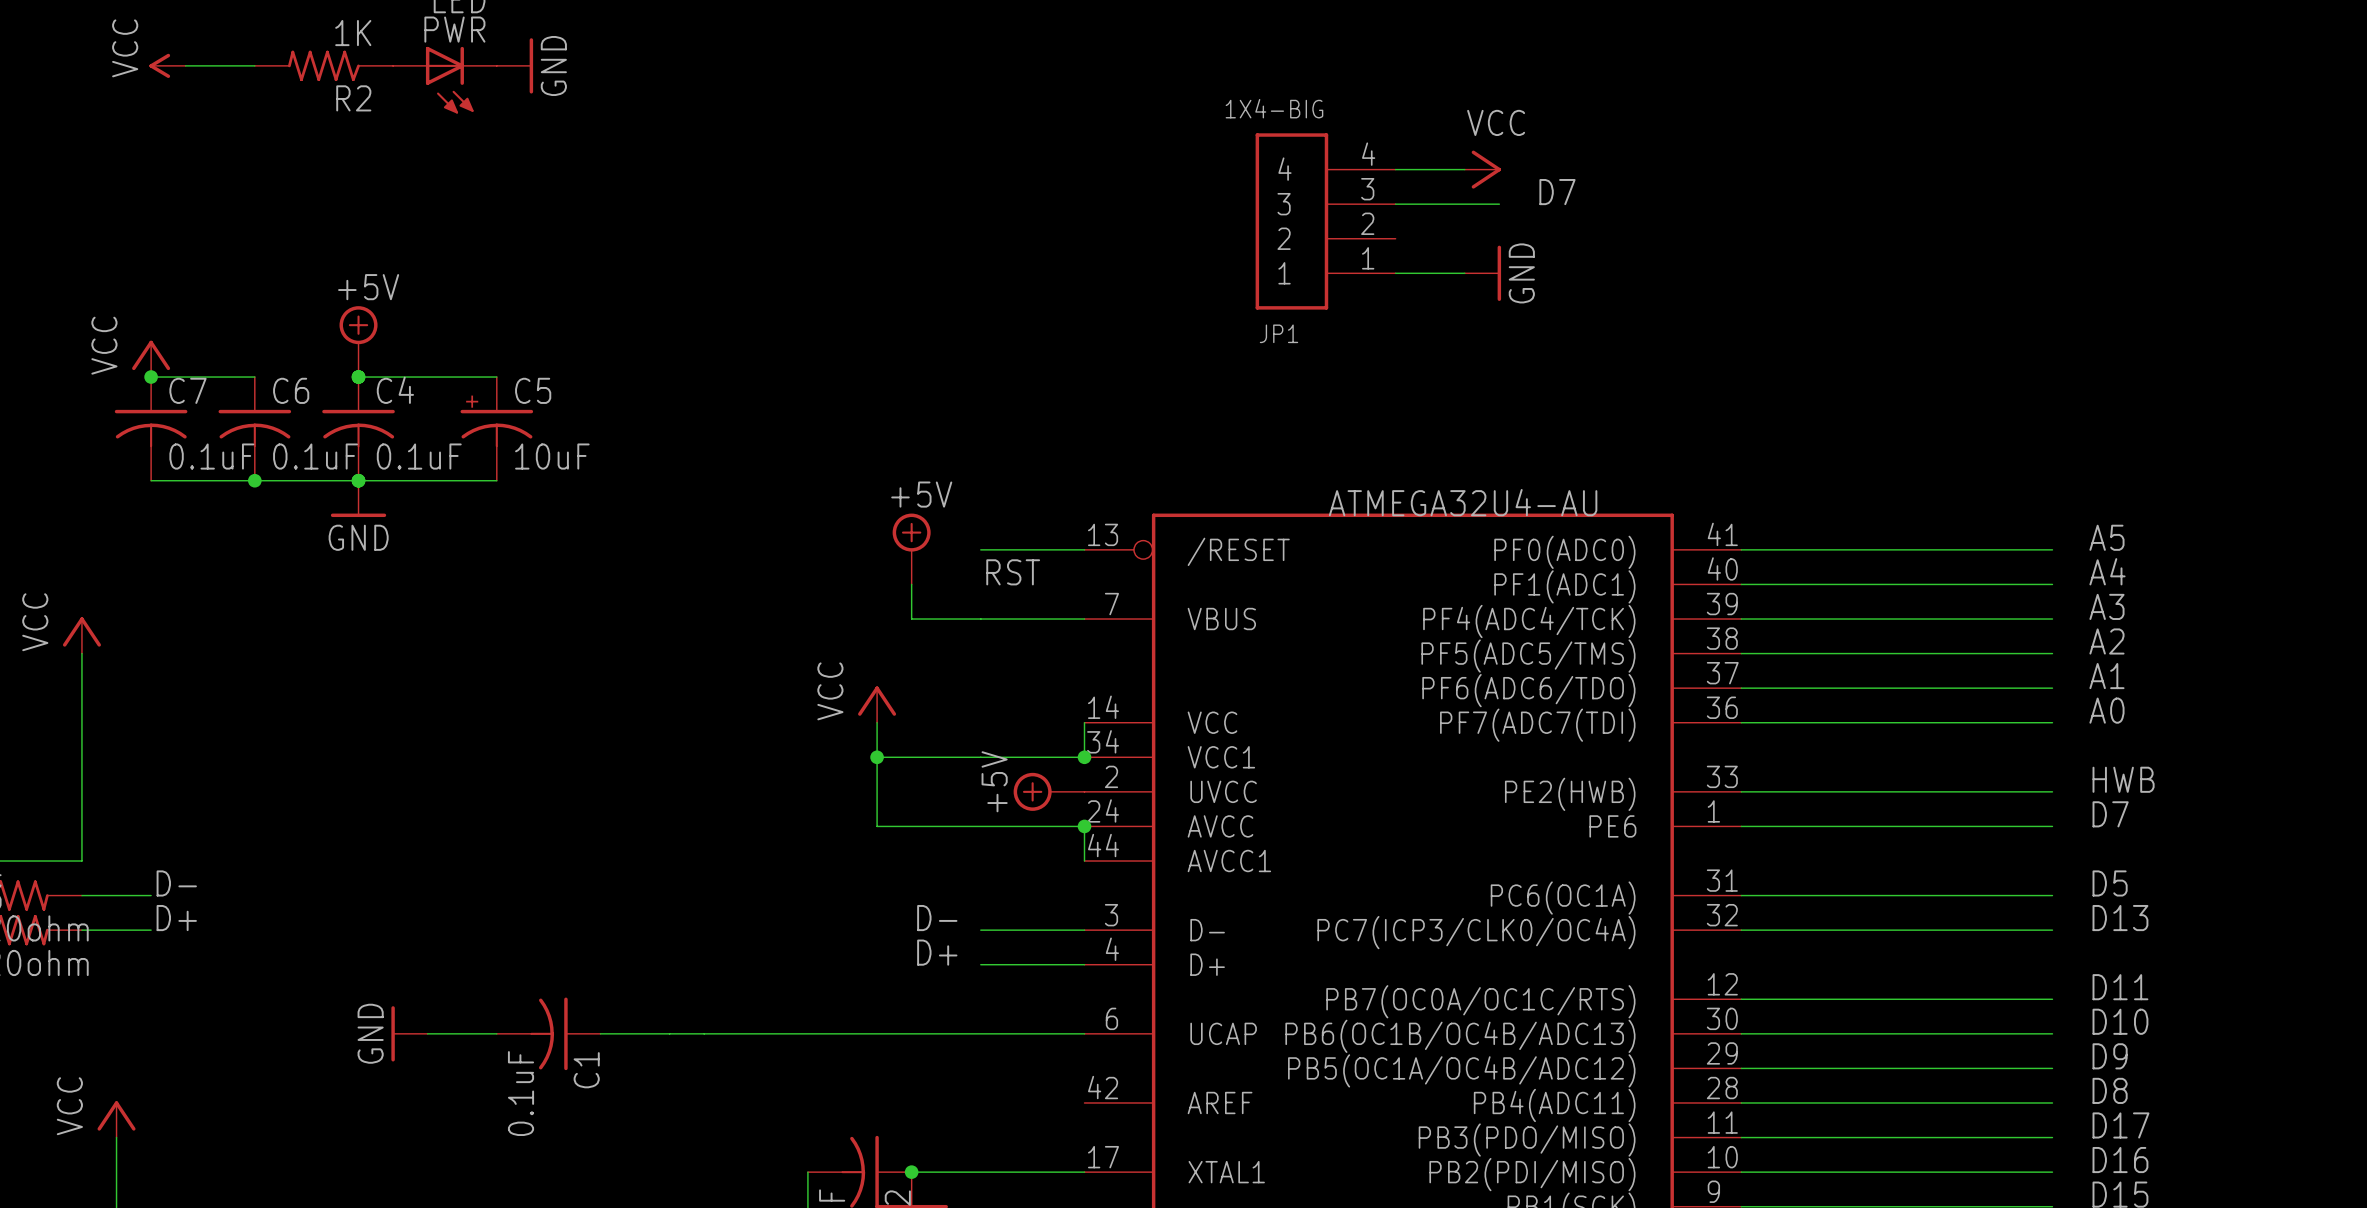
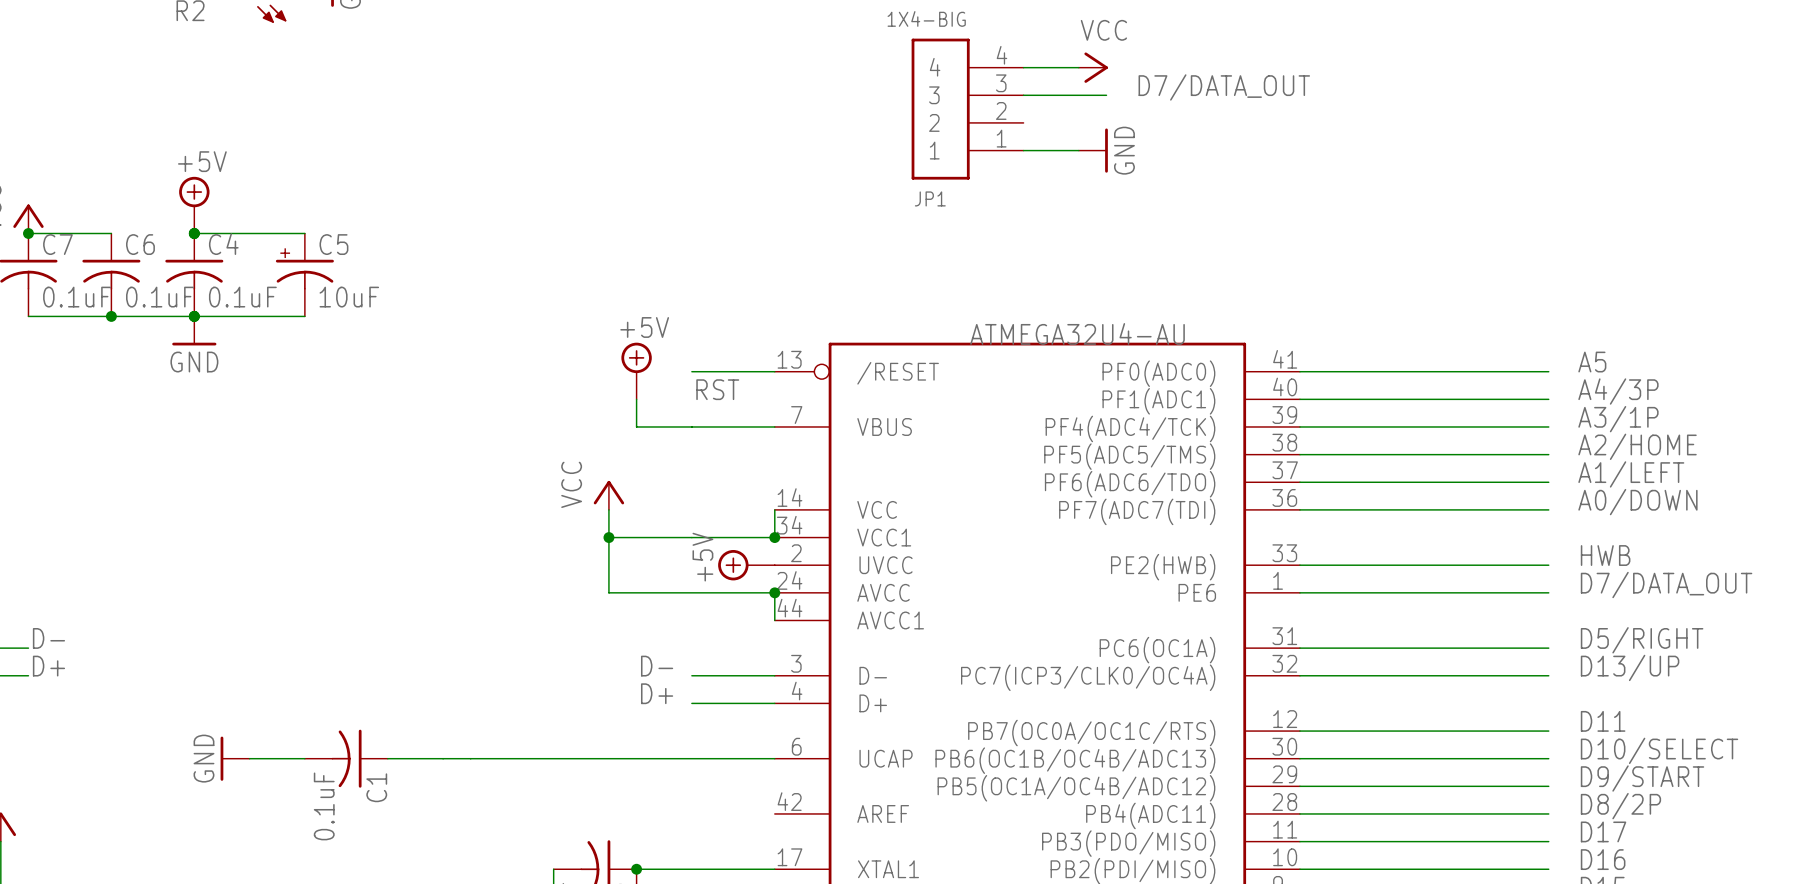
label: D7 (1557, 192) -> D7/DATA_OUT (1224, 87)
label: A4 (2107, 571) -> A4/3P (1618, 391)
label: A3 (2106, 606) -> A3/1P (1618, 419)
label: A2 (2106, 641) -> A2/HOME (1637, 446)
label: A1 (2106, 676) -> A1/LEFT (1631, 474)
label: A0 (2106, 710) -> A0/DOWN (1637, 502)
label: D7 (2110, 814) -> D7/DATA_OUT (1666, 585)
label: D5 (2110, 883) -> D5/RIGHT (1642, 640)
label: D13 (2120, 918) -> D13/UP (1630, 667)
label: D10 (2120, 1021) -> D10/SELECT (1659, 750)
label: D9 (2110, 1056) -> D9/START (1642, 778)
label: D8 (2110, 1090) -> D8/2P (1620, 806)

